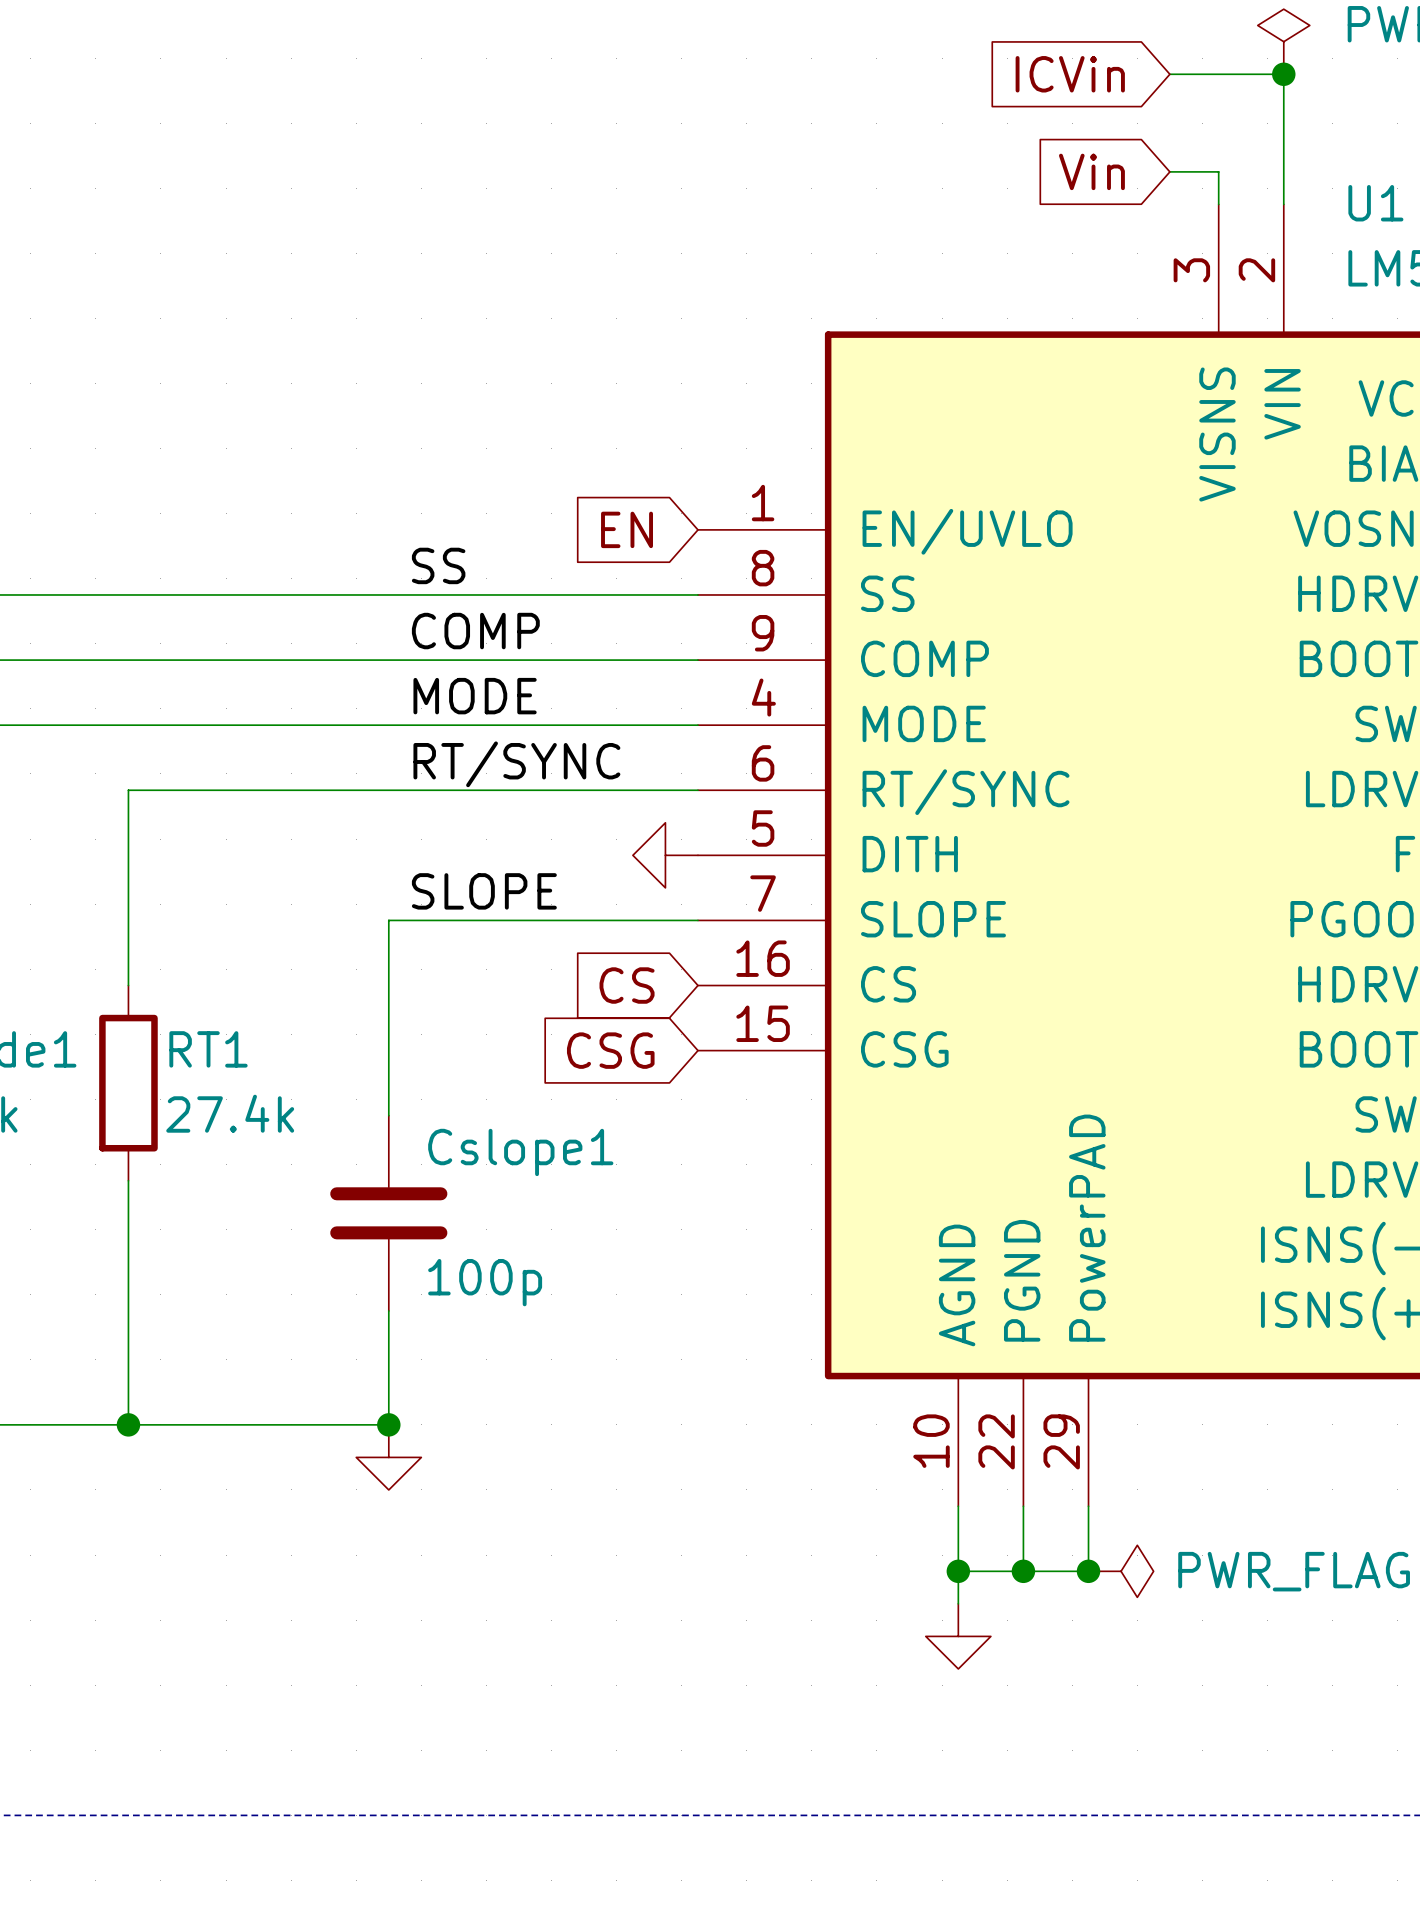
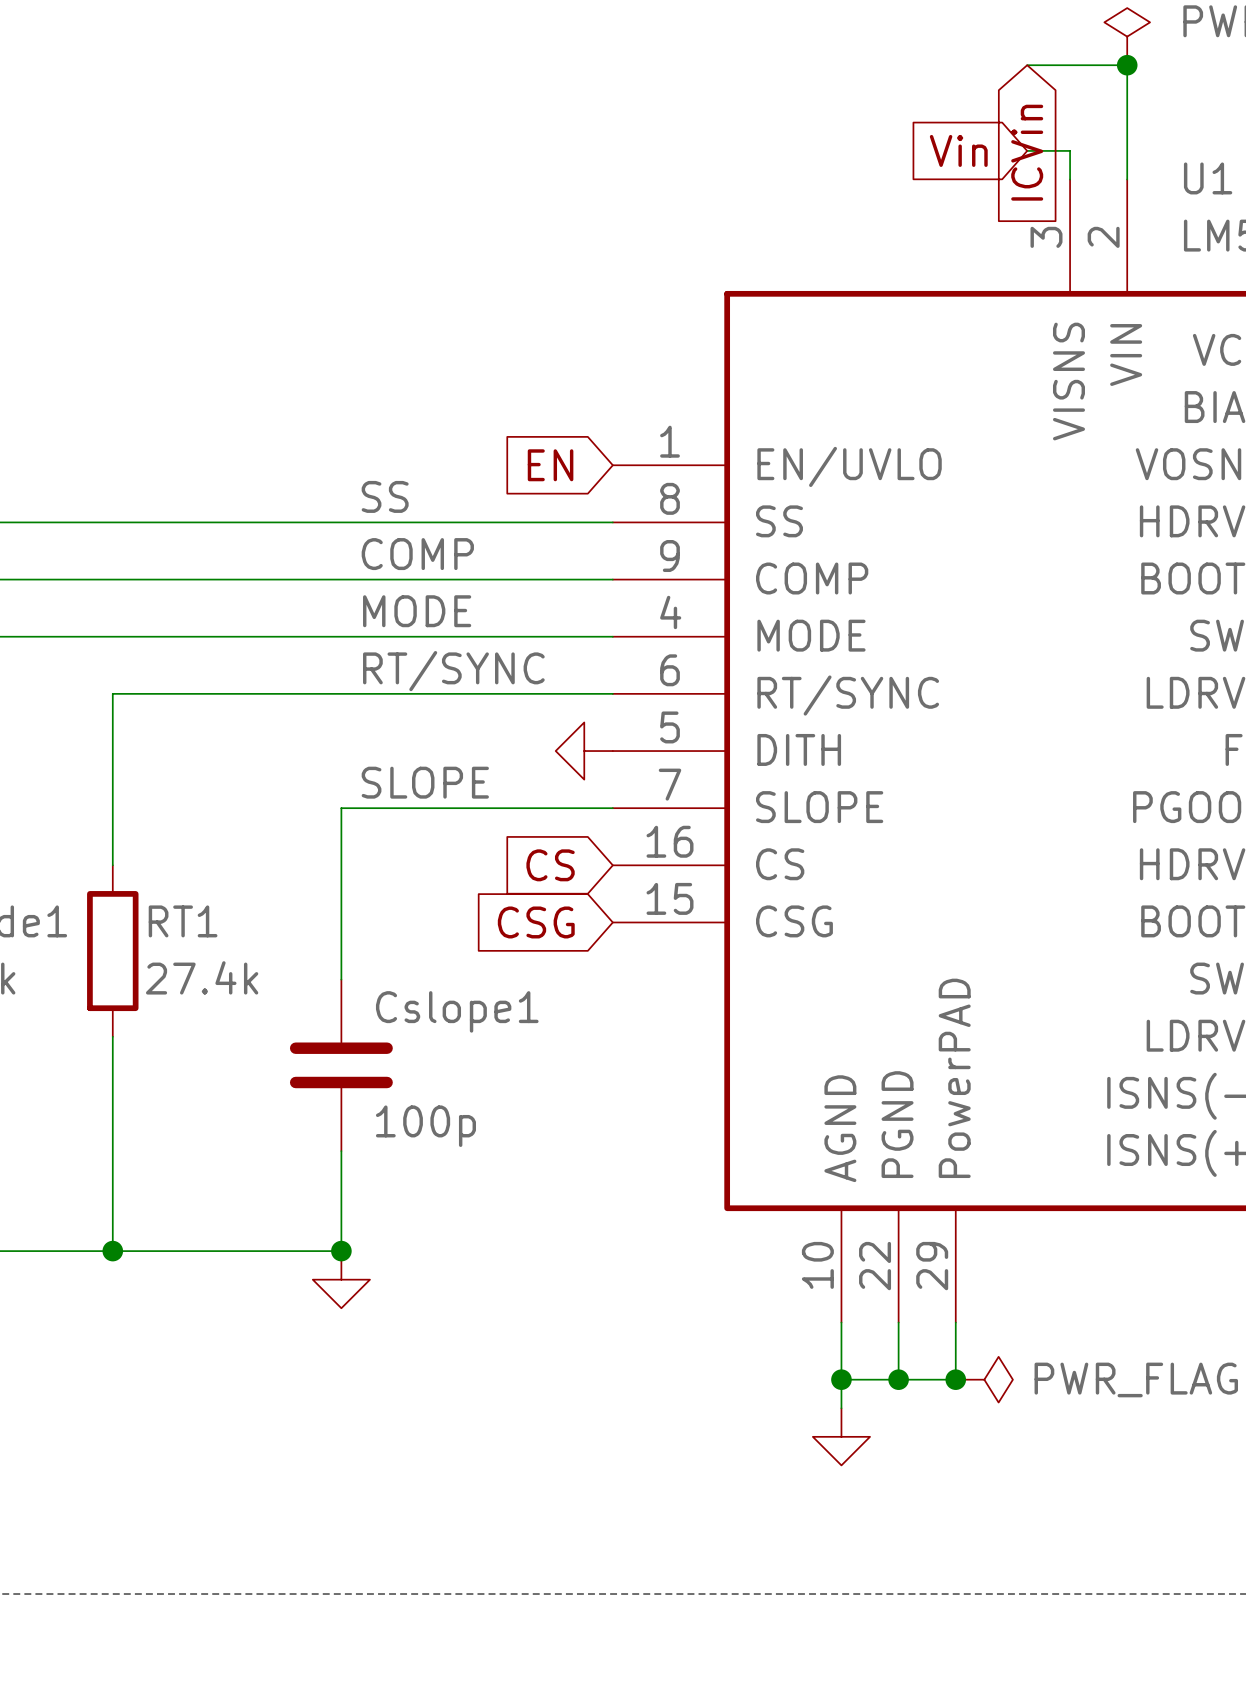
global label rotation: 0° (1070, 74) -> 90° counterclockwise (1027, 152)

